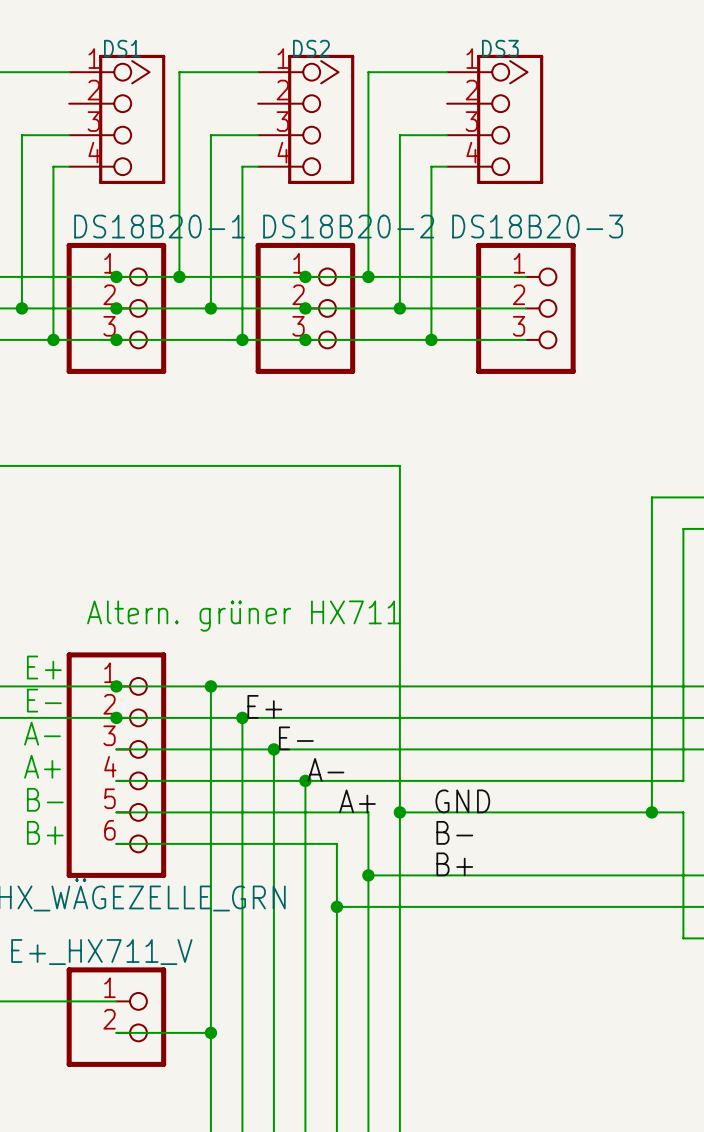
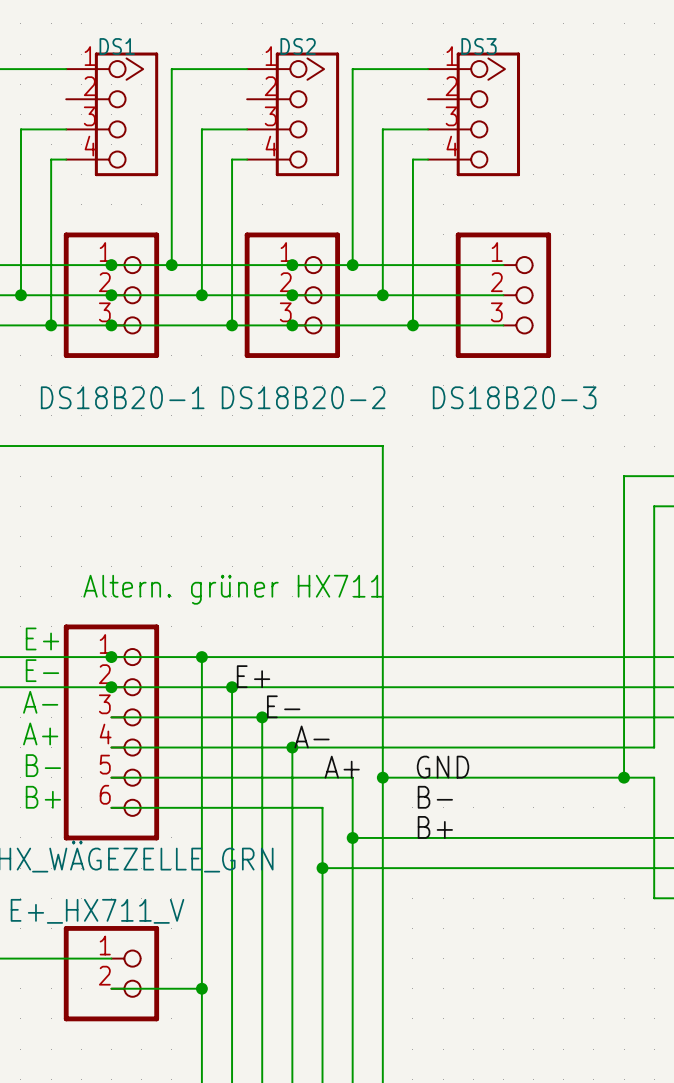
DS18B20-1 name position: DS18B20-1 (159, 226) -> DS18B20-1 (122, 397)
DS18B20-2 name position: DS18B20-2 (348, 226) -> DS18B20-2 (303, 397)
DS18B20-3 name position: DS18B20-3 (537, 226) -> DS18B20-3 (514, 397)

